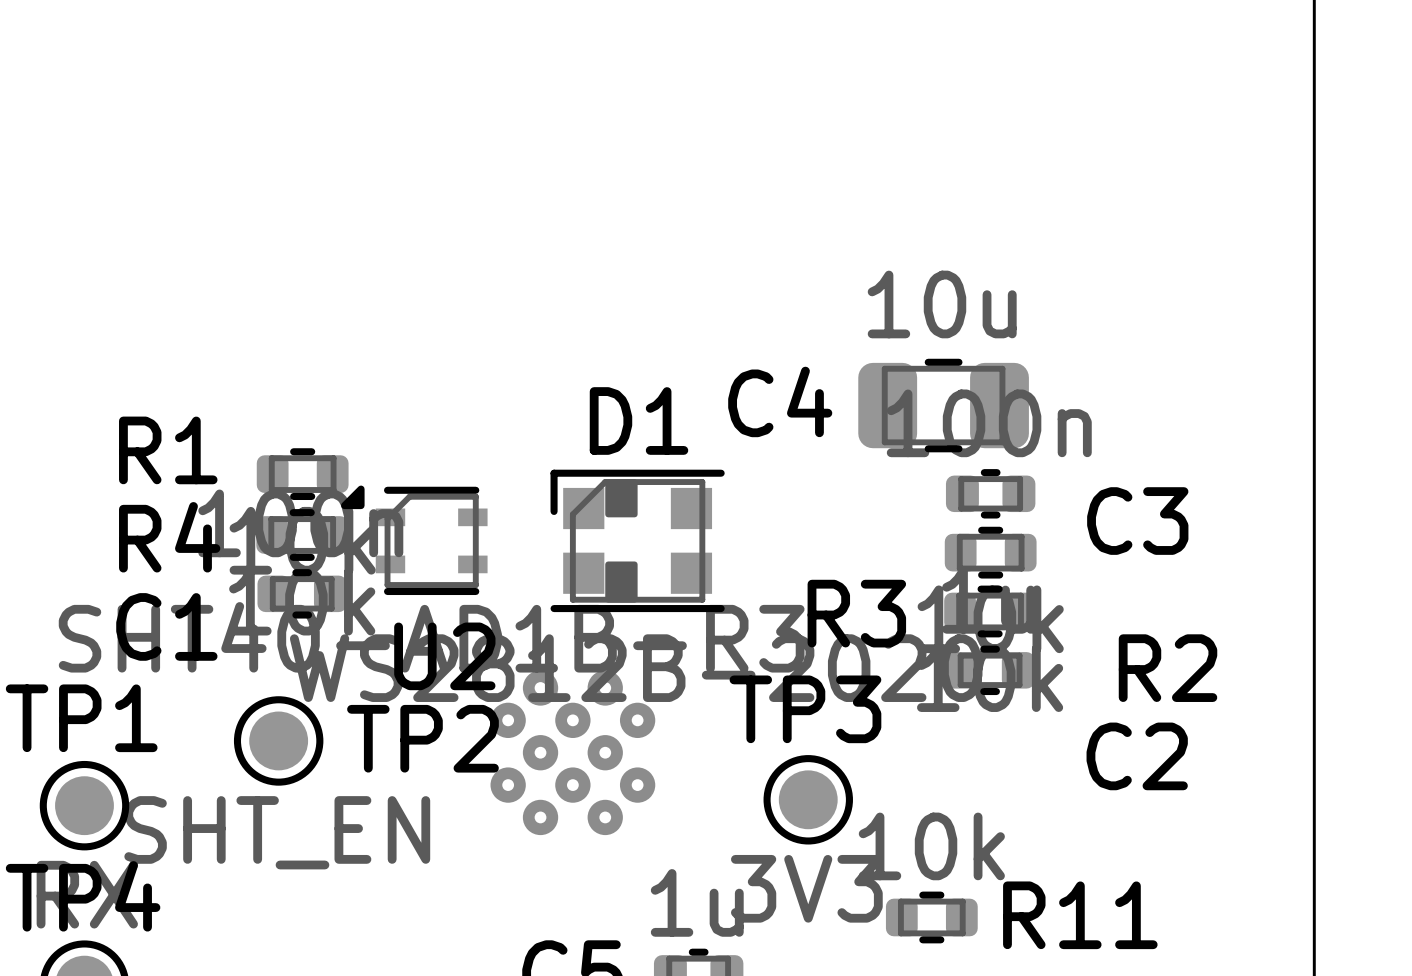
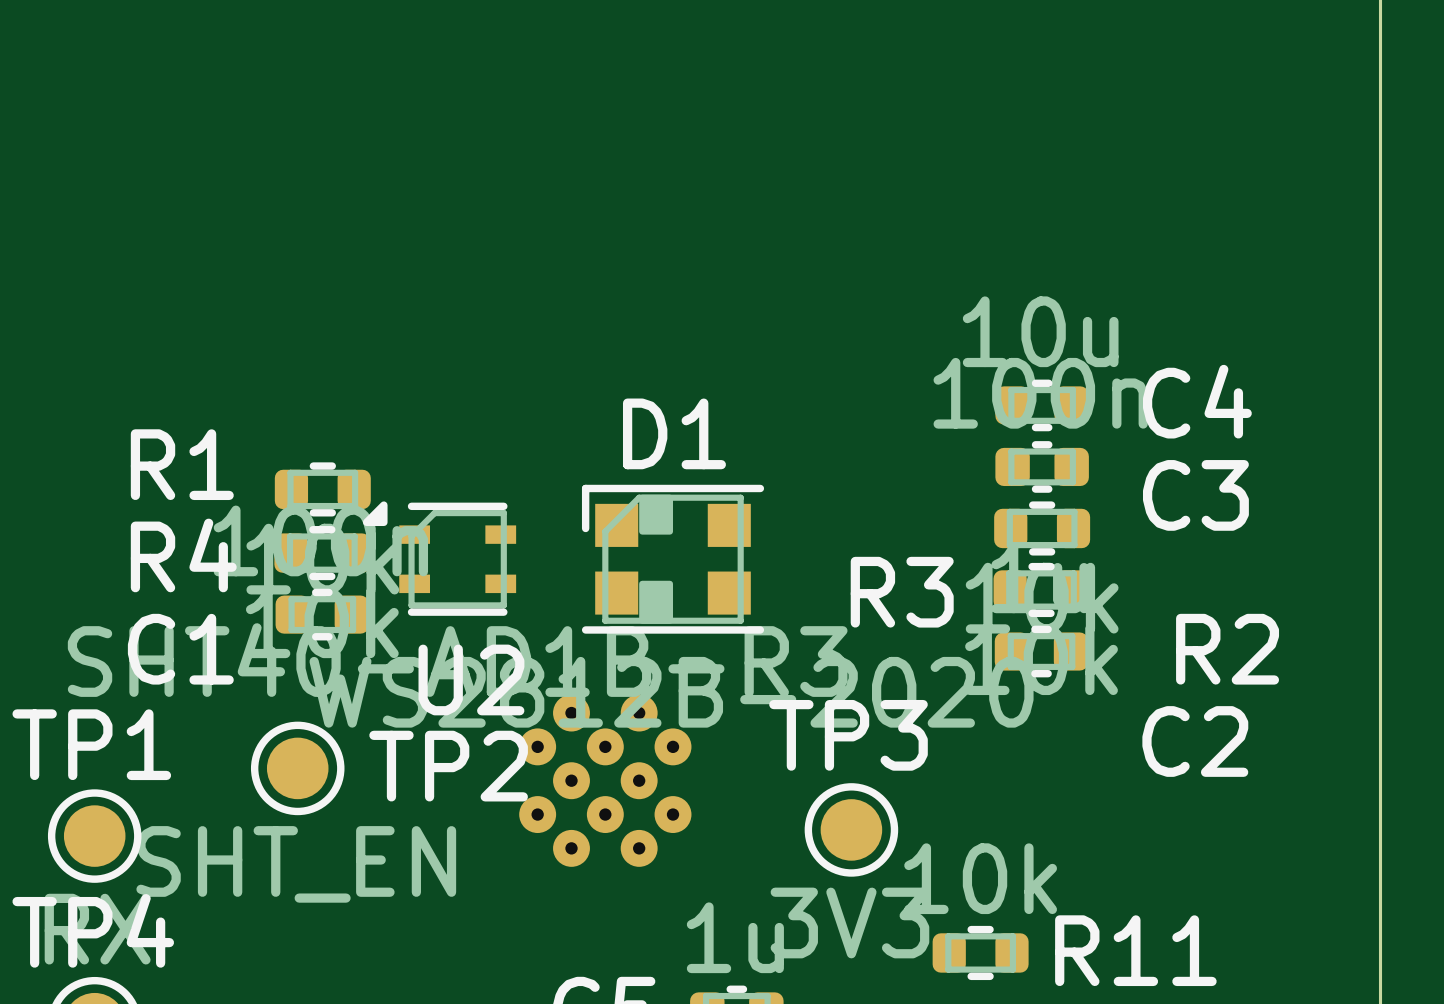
C4 footprint: [858, 358, 1029, 453] -> [995, 379, 1089, 432]
C4 name position: C4 (780, 401) -> C4 (1197, 401)
C3 position: (990, 493) -> (1042, 466)
R3 position: (990, 552) -> (1042, 528)
R2 position: (990, 611) -> (1041, 589)
C2 position: (990, 670) -> (1041, 651)

